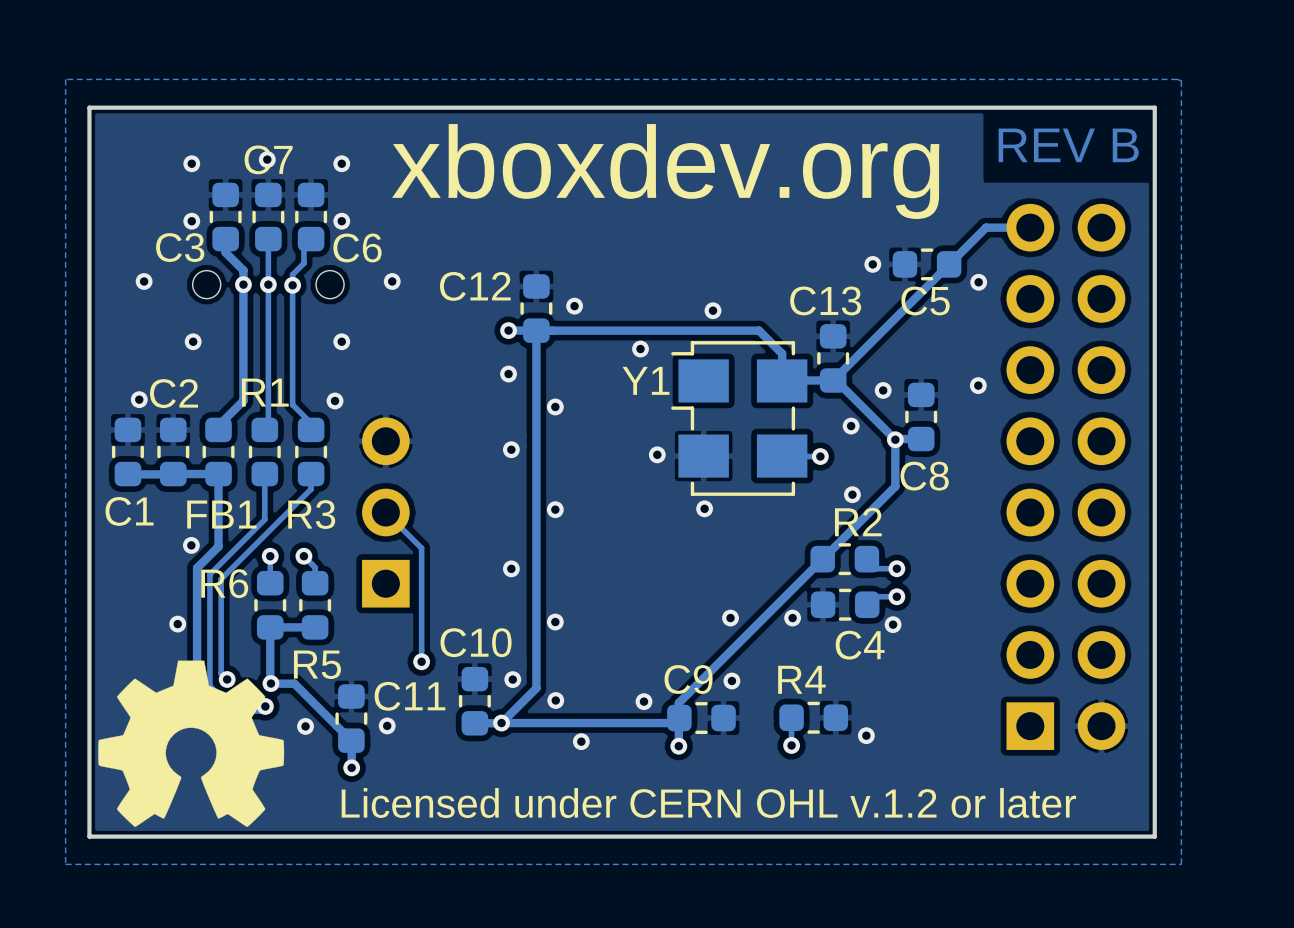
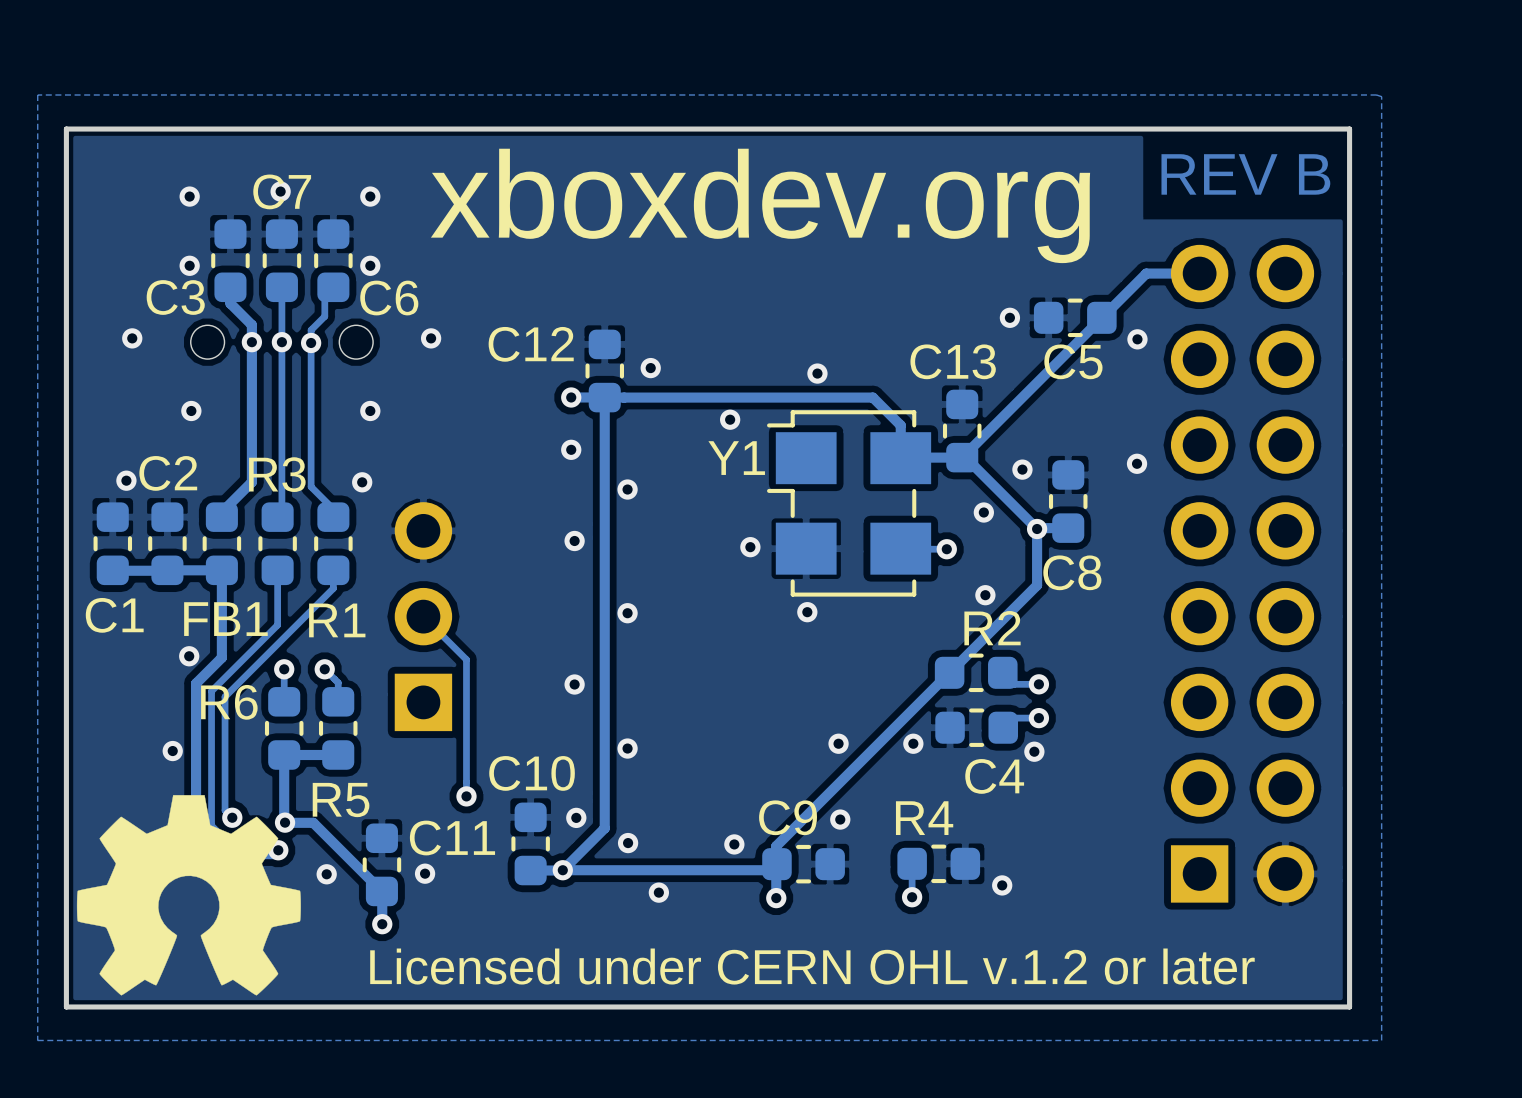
R1 name position: R1 (265, 392) -> R1 (337, 620)
R3 name position: R3 (311, 514) -> R3 (277, 474)

